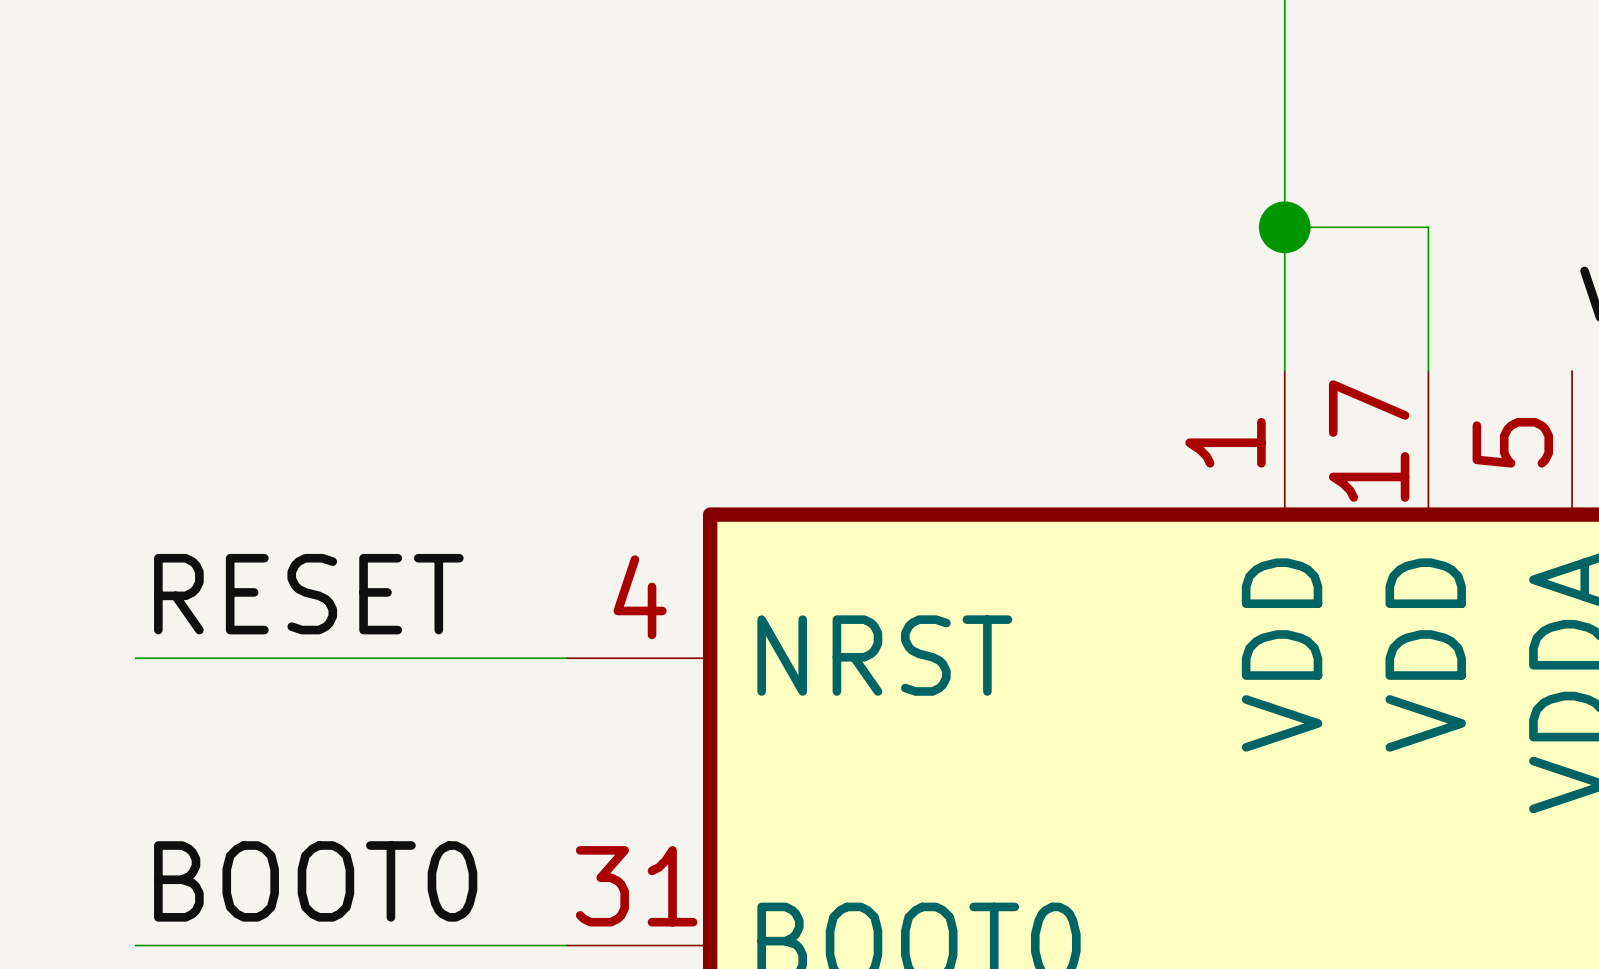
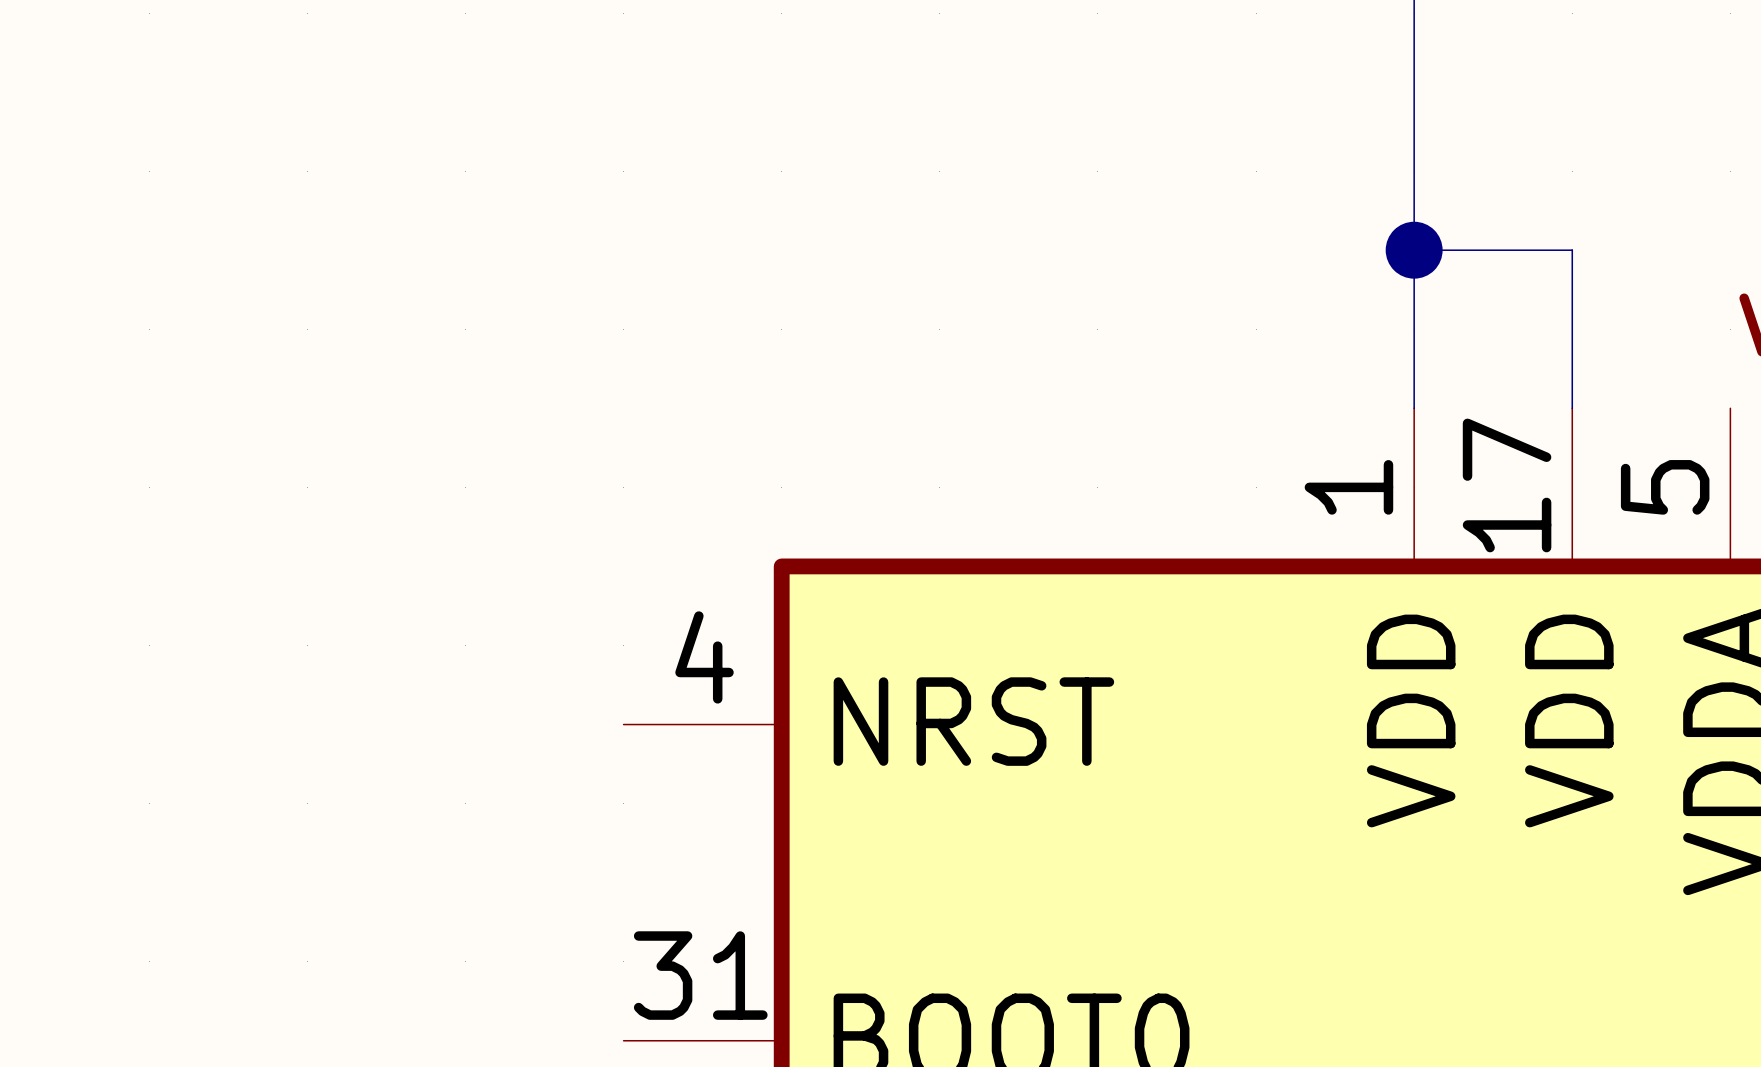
label: RESET (308, 594) -> none
wire: (135, 658) (566, 658) -> none
label: BOOT0 (315, 881) -> none
wire: (135, 945) (566, 945) -> none

